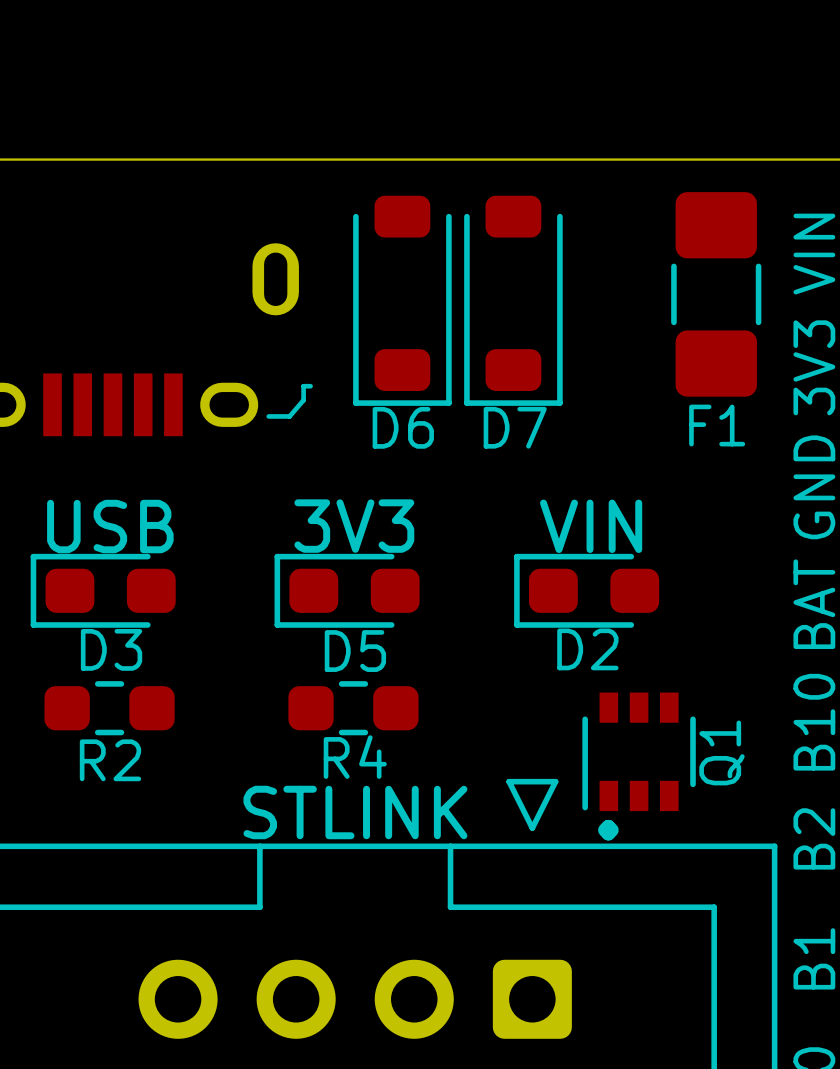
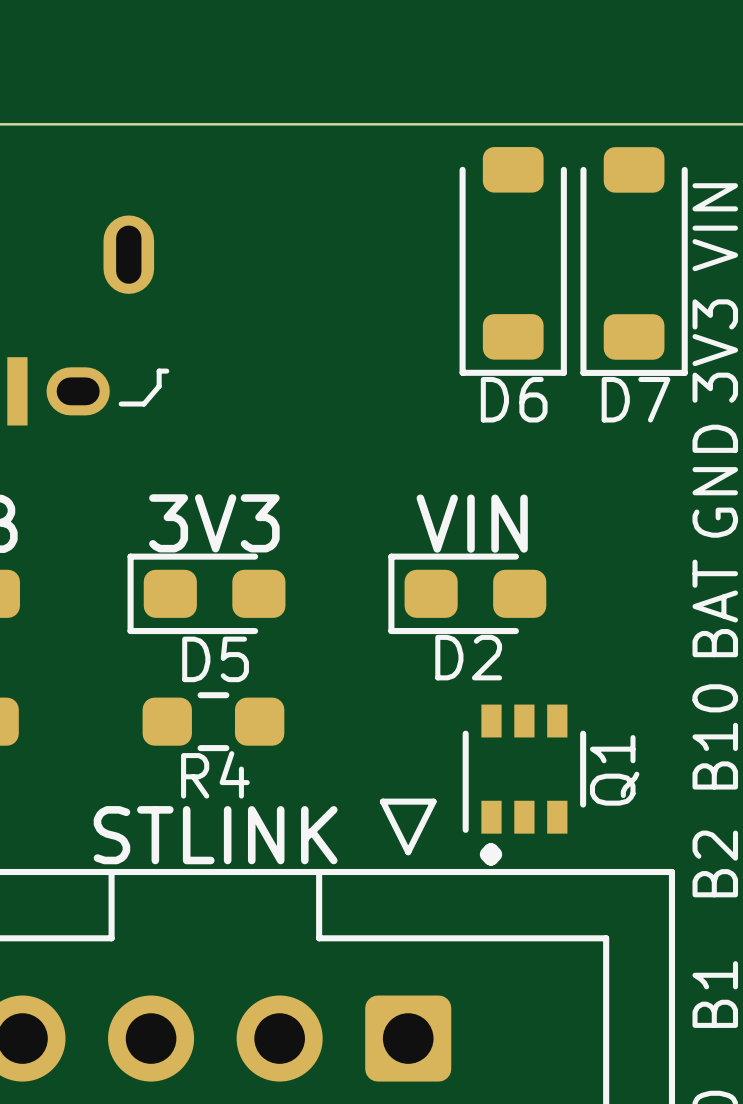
F1: (716, 294) -> none
D6 position: (402, 300) -> (513, 261)
D7 position: (513, 300) -> (634, 261)

